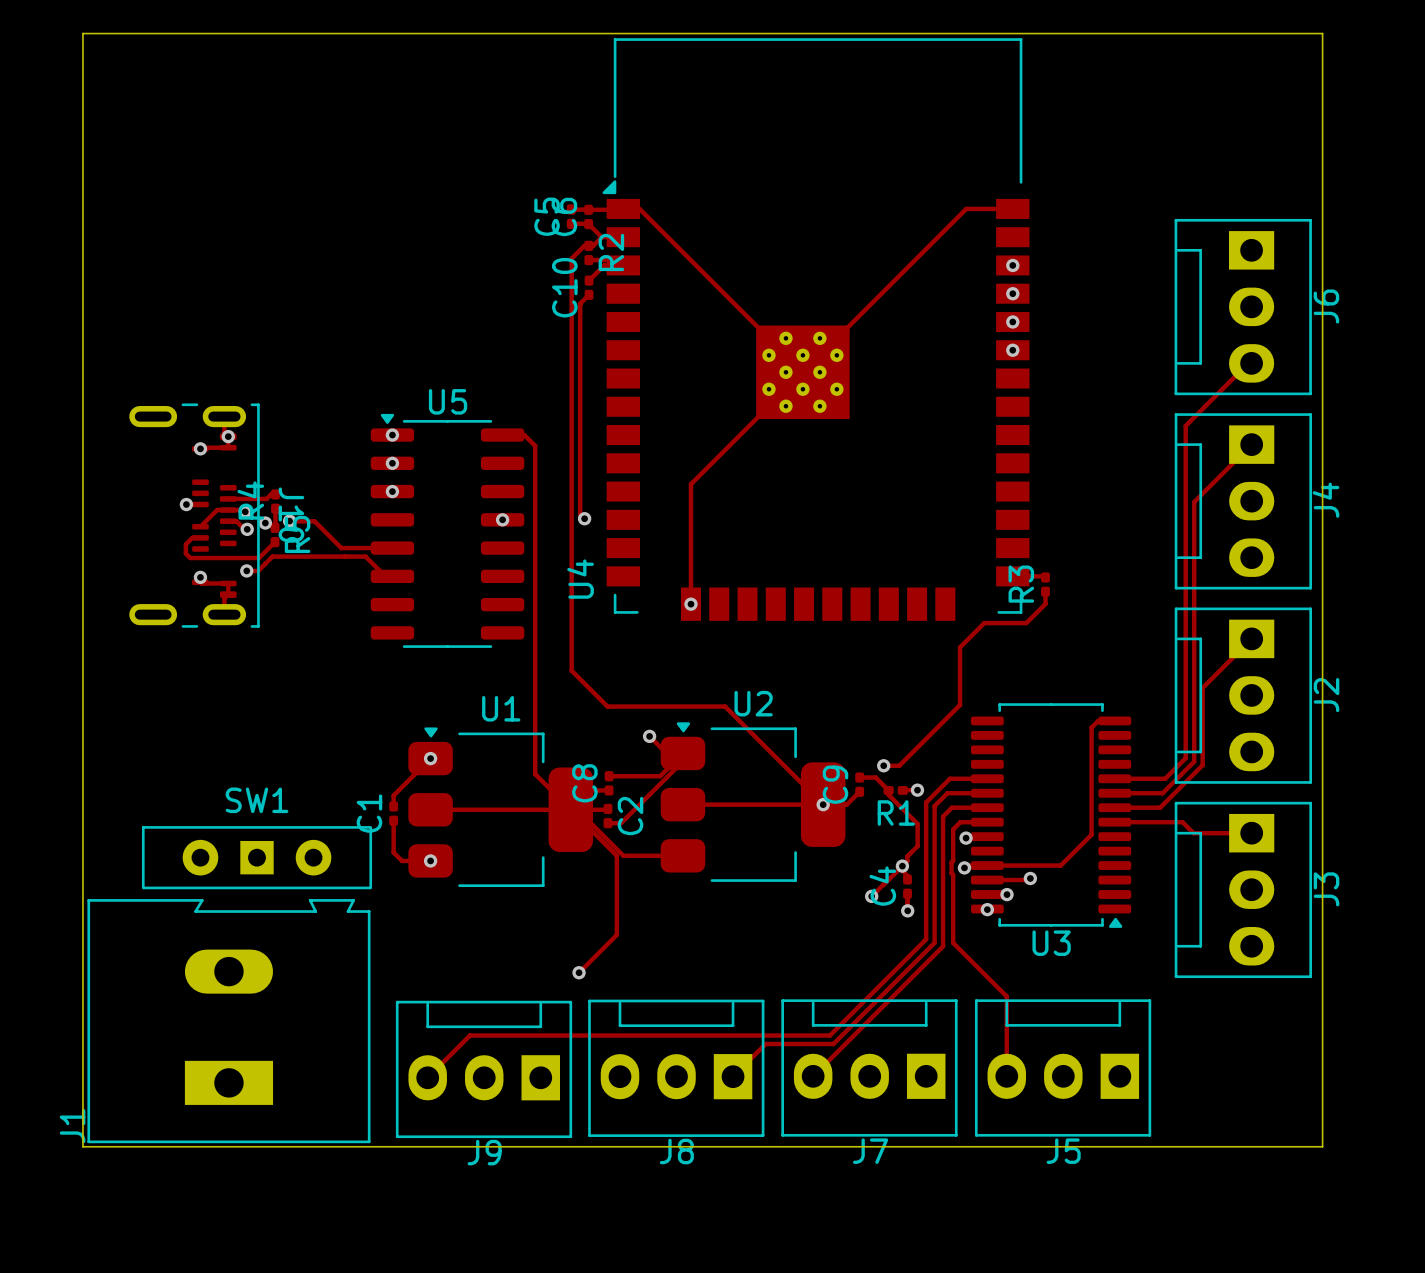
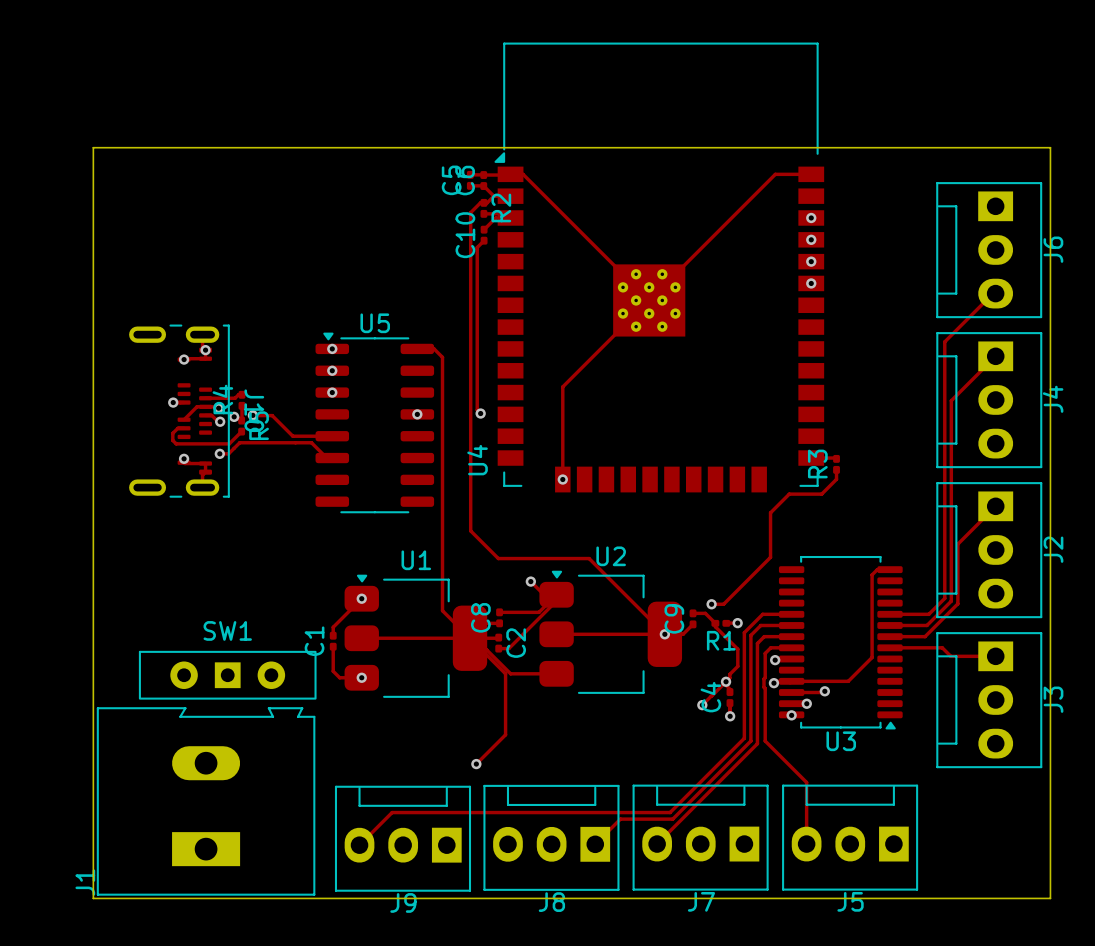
board edge: (82, 174) (82, 33) (1322, 33) (1322, 174) -> (93, 147) (1050, 147)

